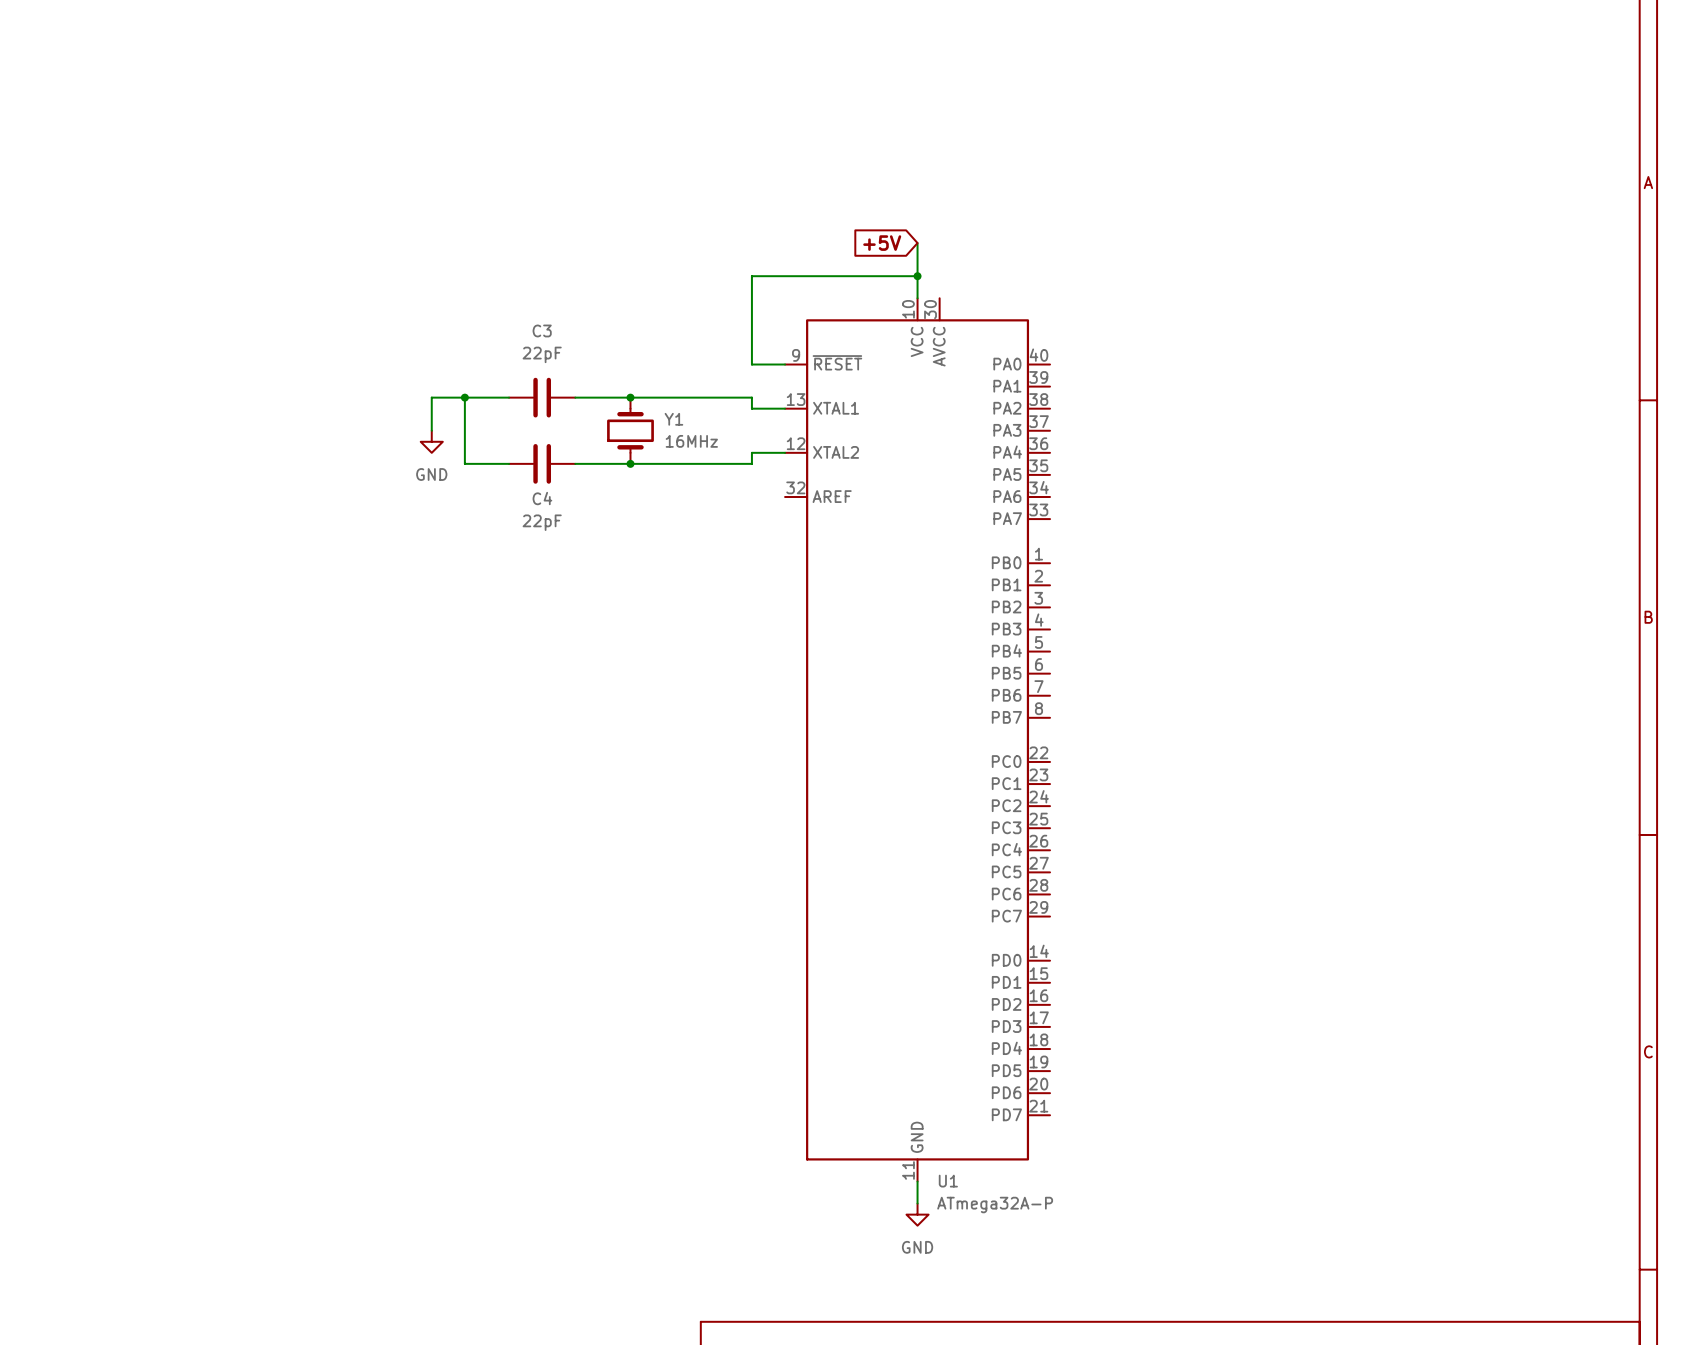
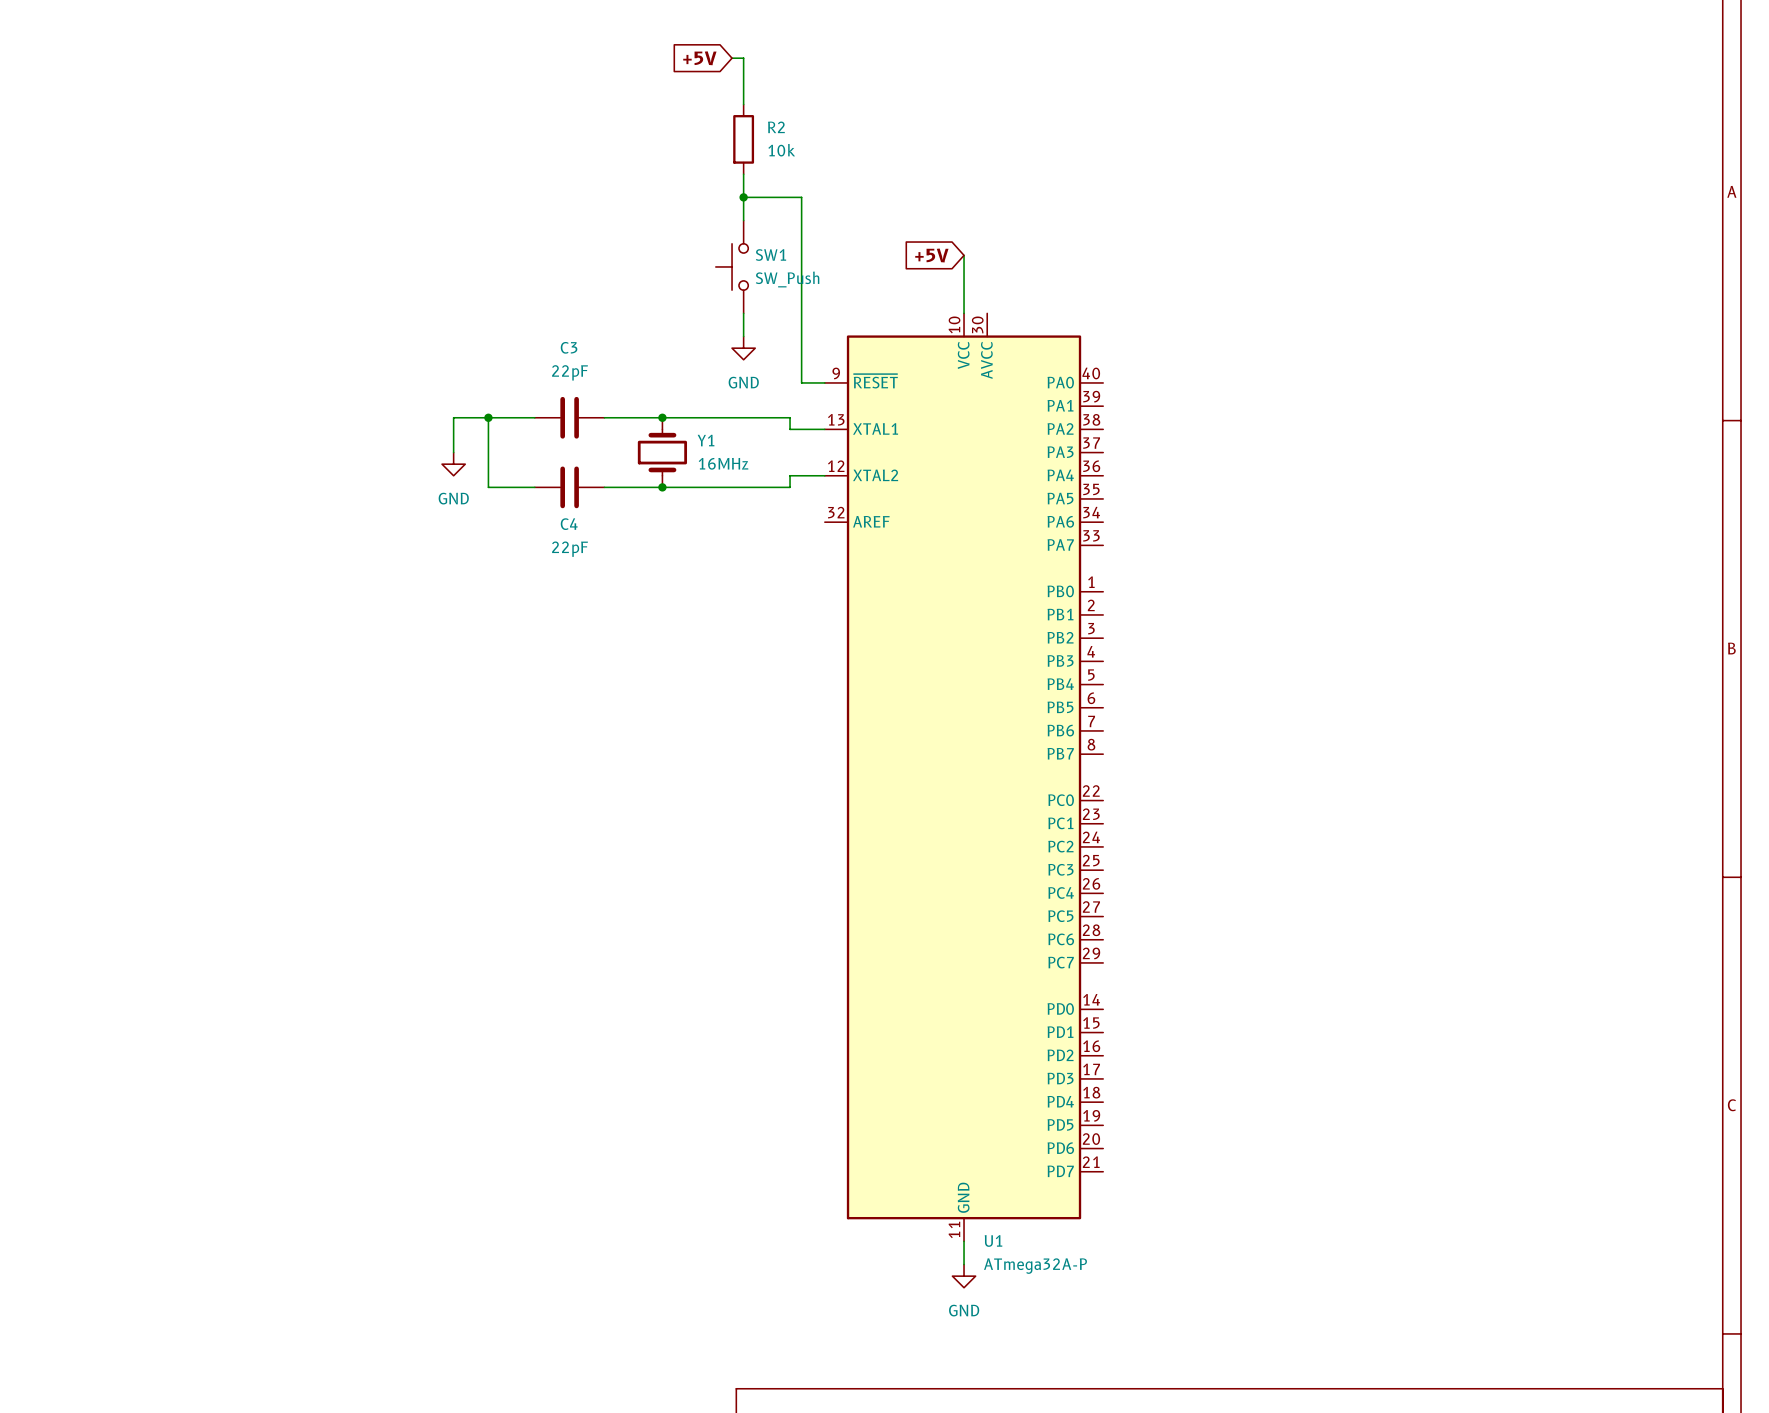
global label: none -> +5V (699, 58)
wire: none -> (732, 58) (743, 58) (743, 104)
R2: none -> 10k (743, 139)
wire: none -> (743, 174) (743, 220)
junction: none -> (743, 197)
SW1: none -> SW_Push (732, 266)
wire: (917, 276) (751, 276) (751, 364) (762, 364) -> (743, 197) (801, 197) (801, 382)
junction: (917, 276) -> none
wire: none -> (743, 313) (743, 336)
power symbol: none -> GND (743, 348)

